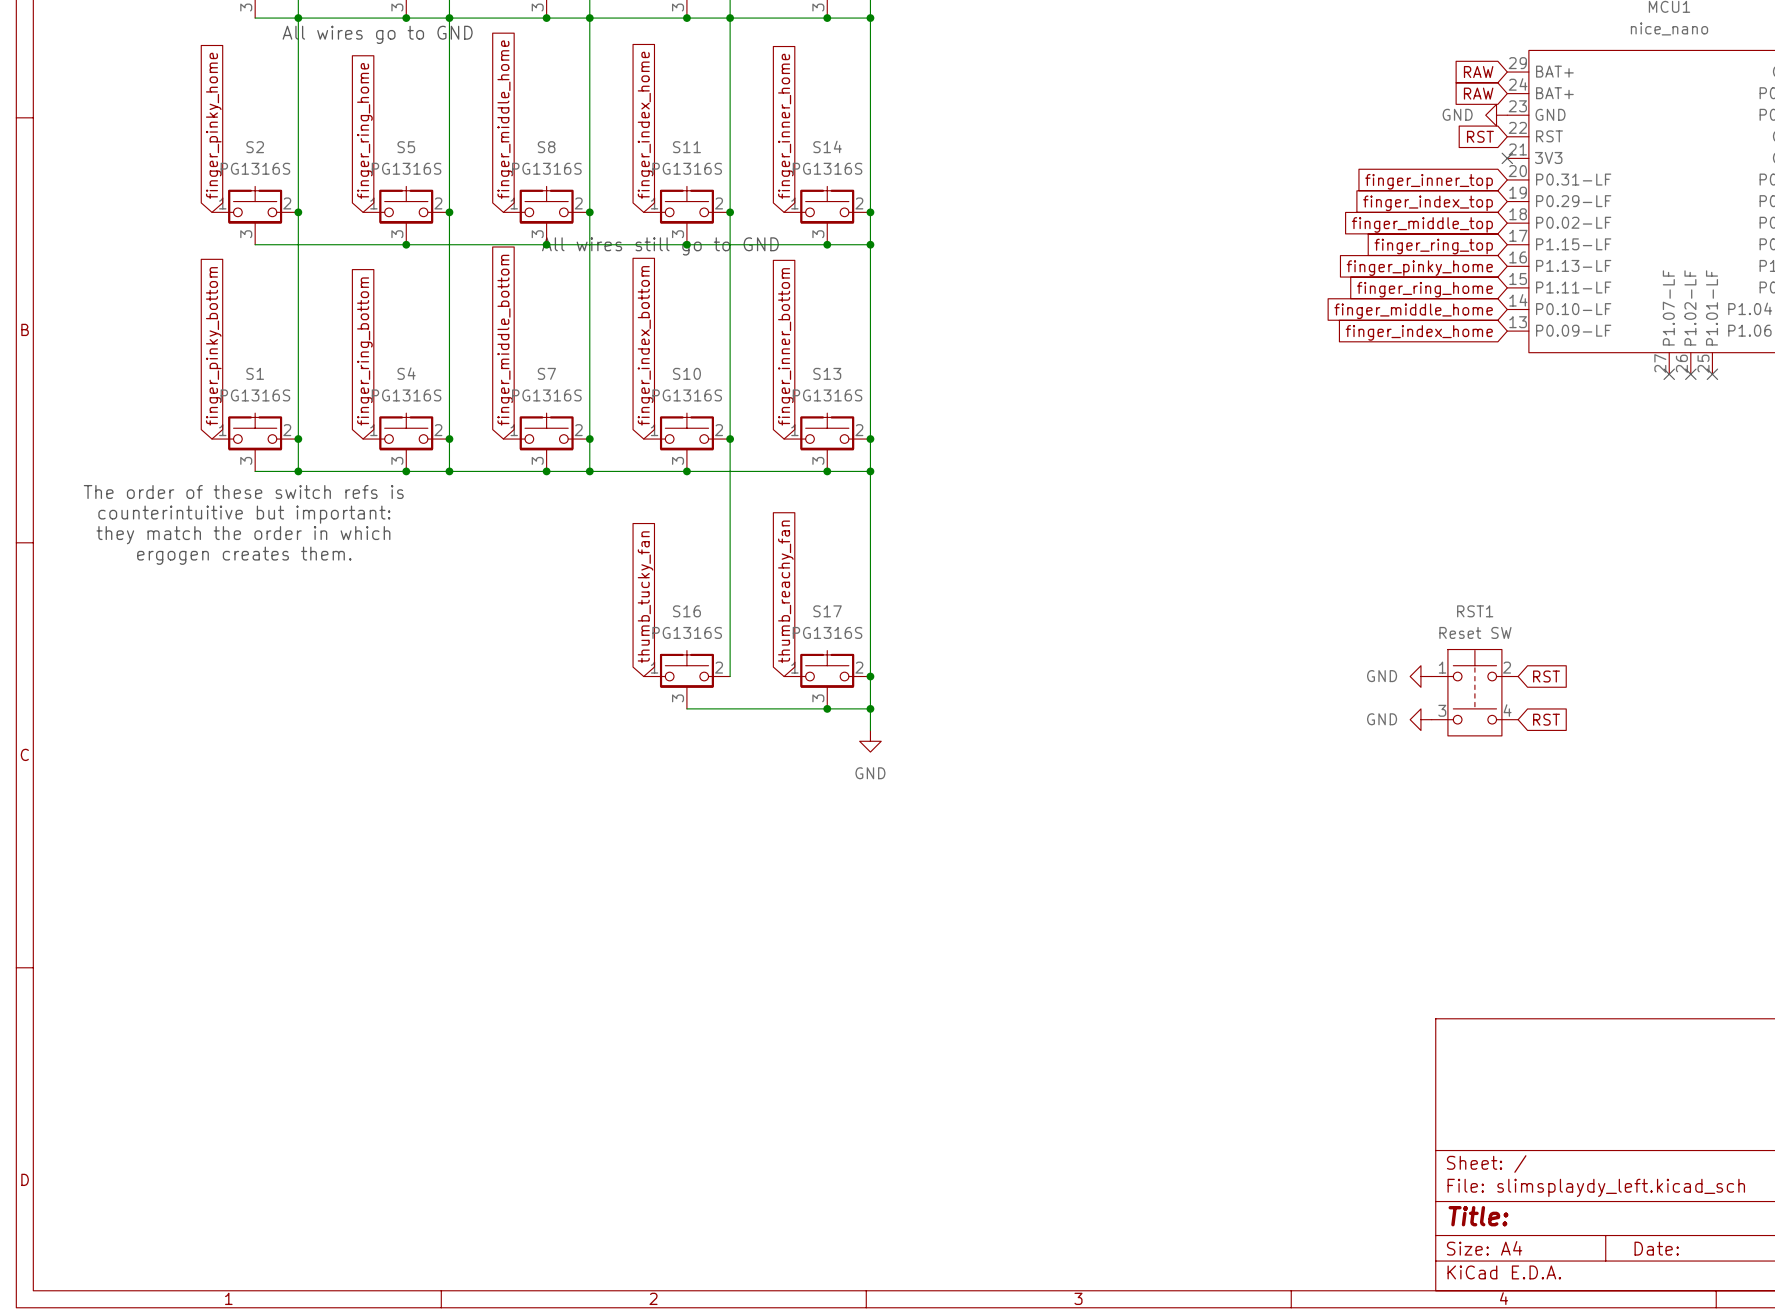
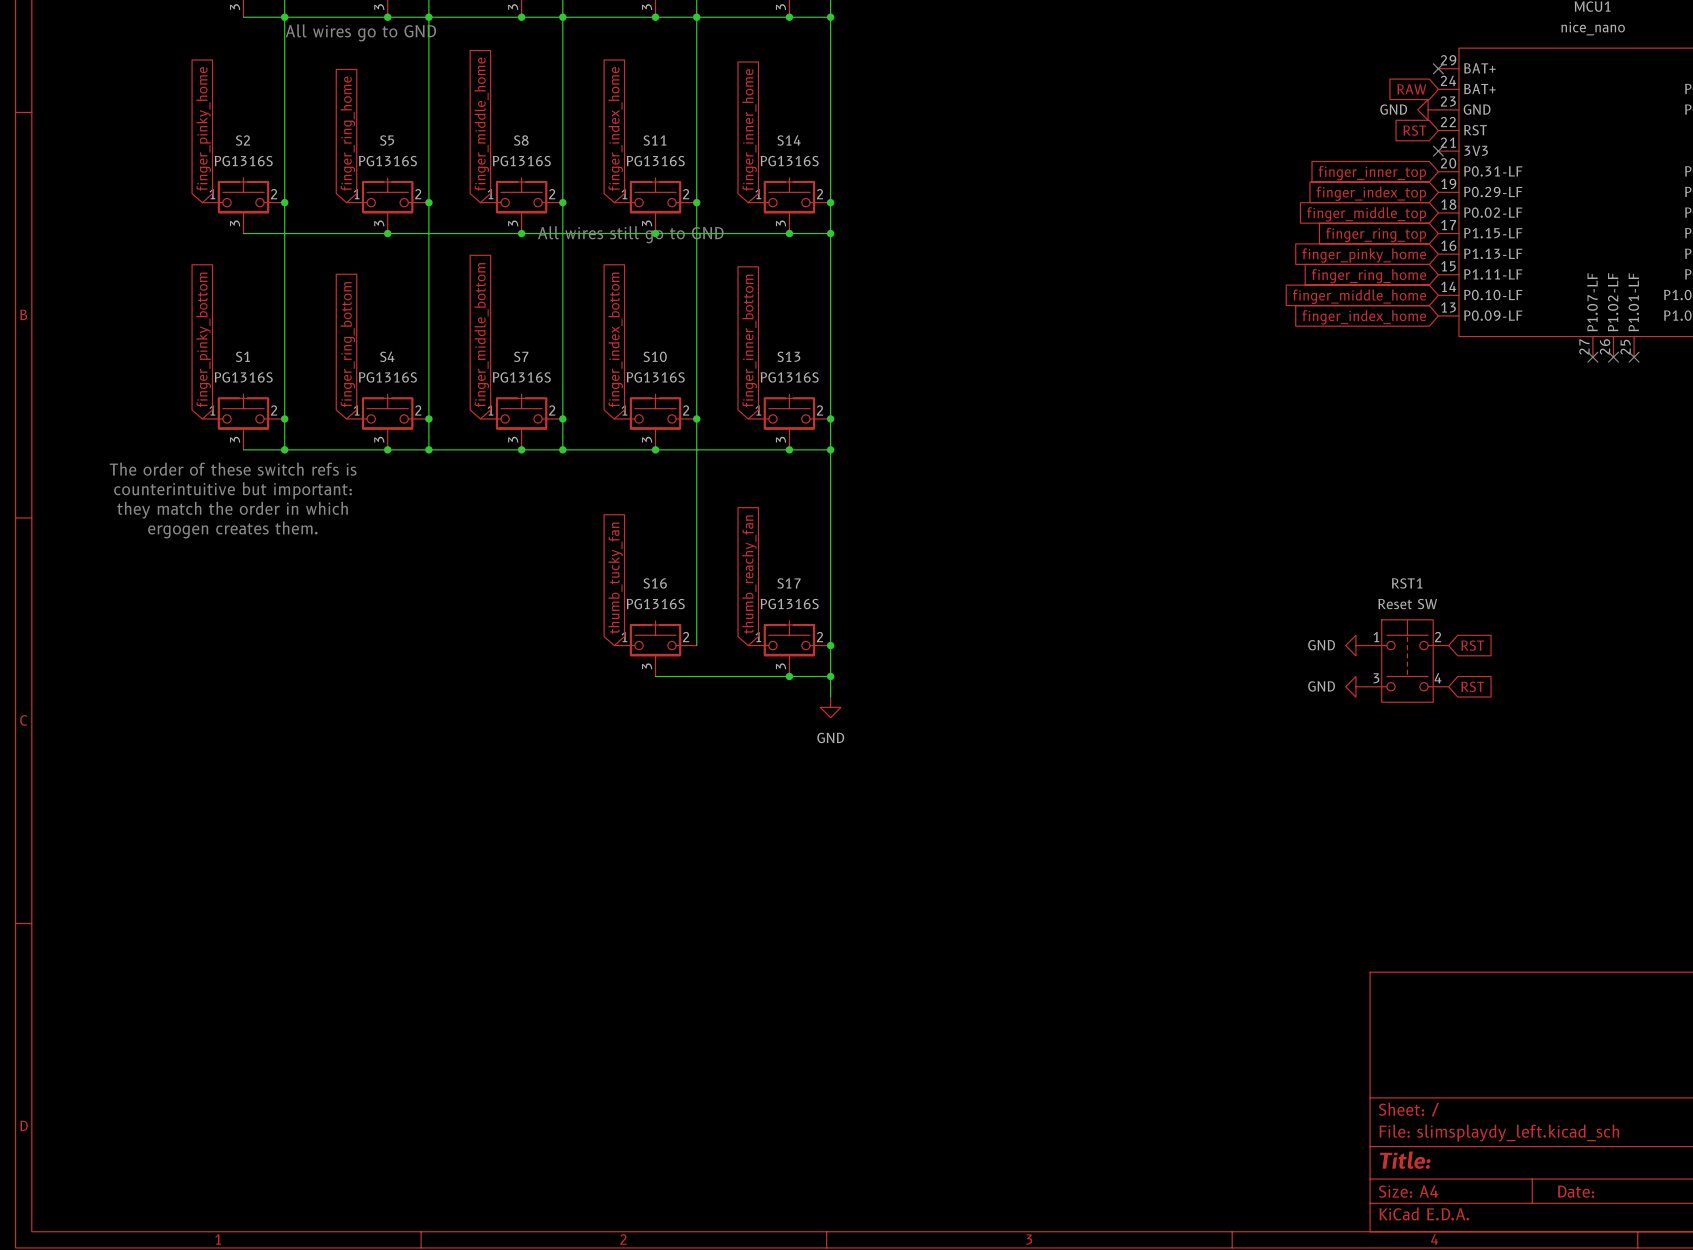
global label: RAW (1478, 72) -> none
no-connect mark: none -> (1438, 68)

